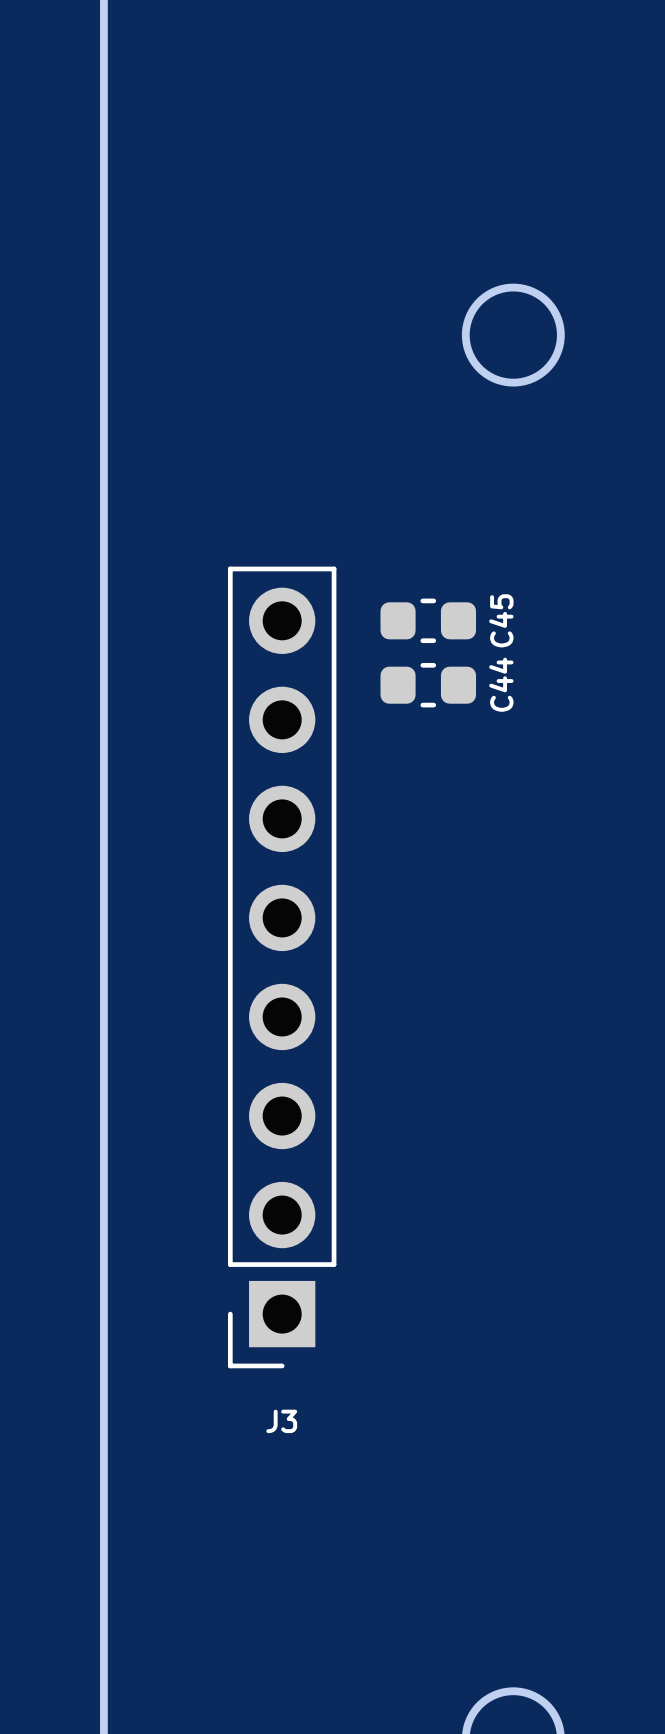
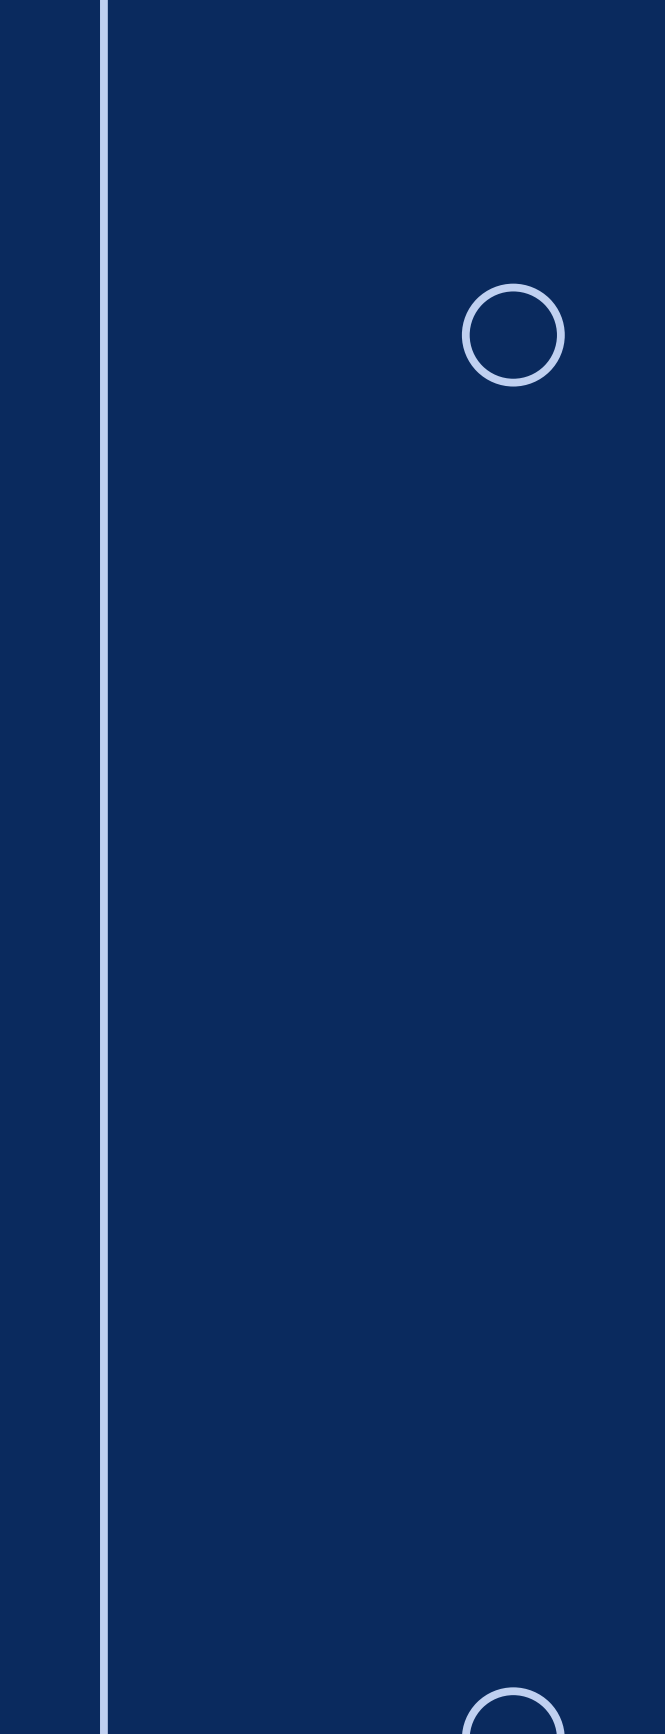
C45: (428, 620) -> none
C44: (428, 685) -> none
J3: (282, 967) -> none

